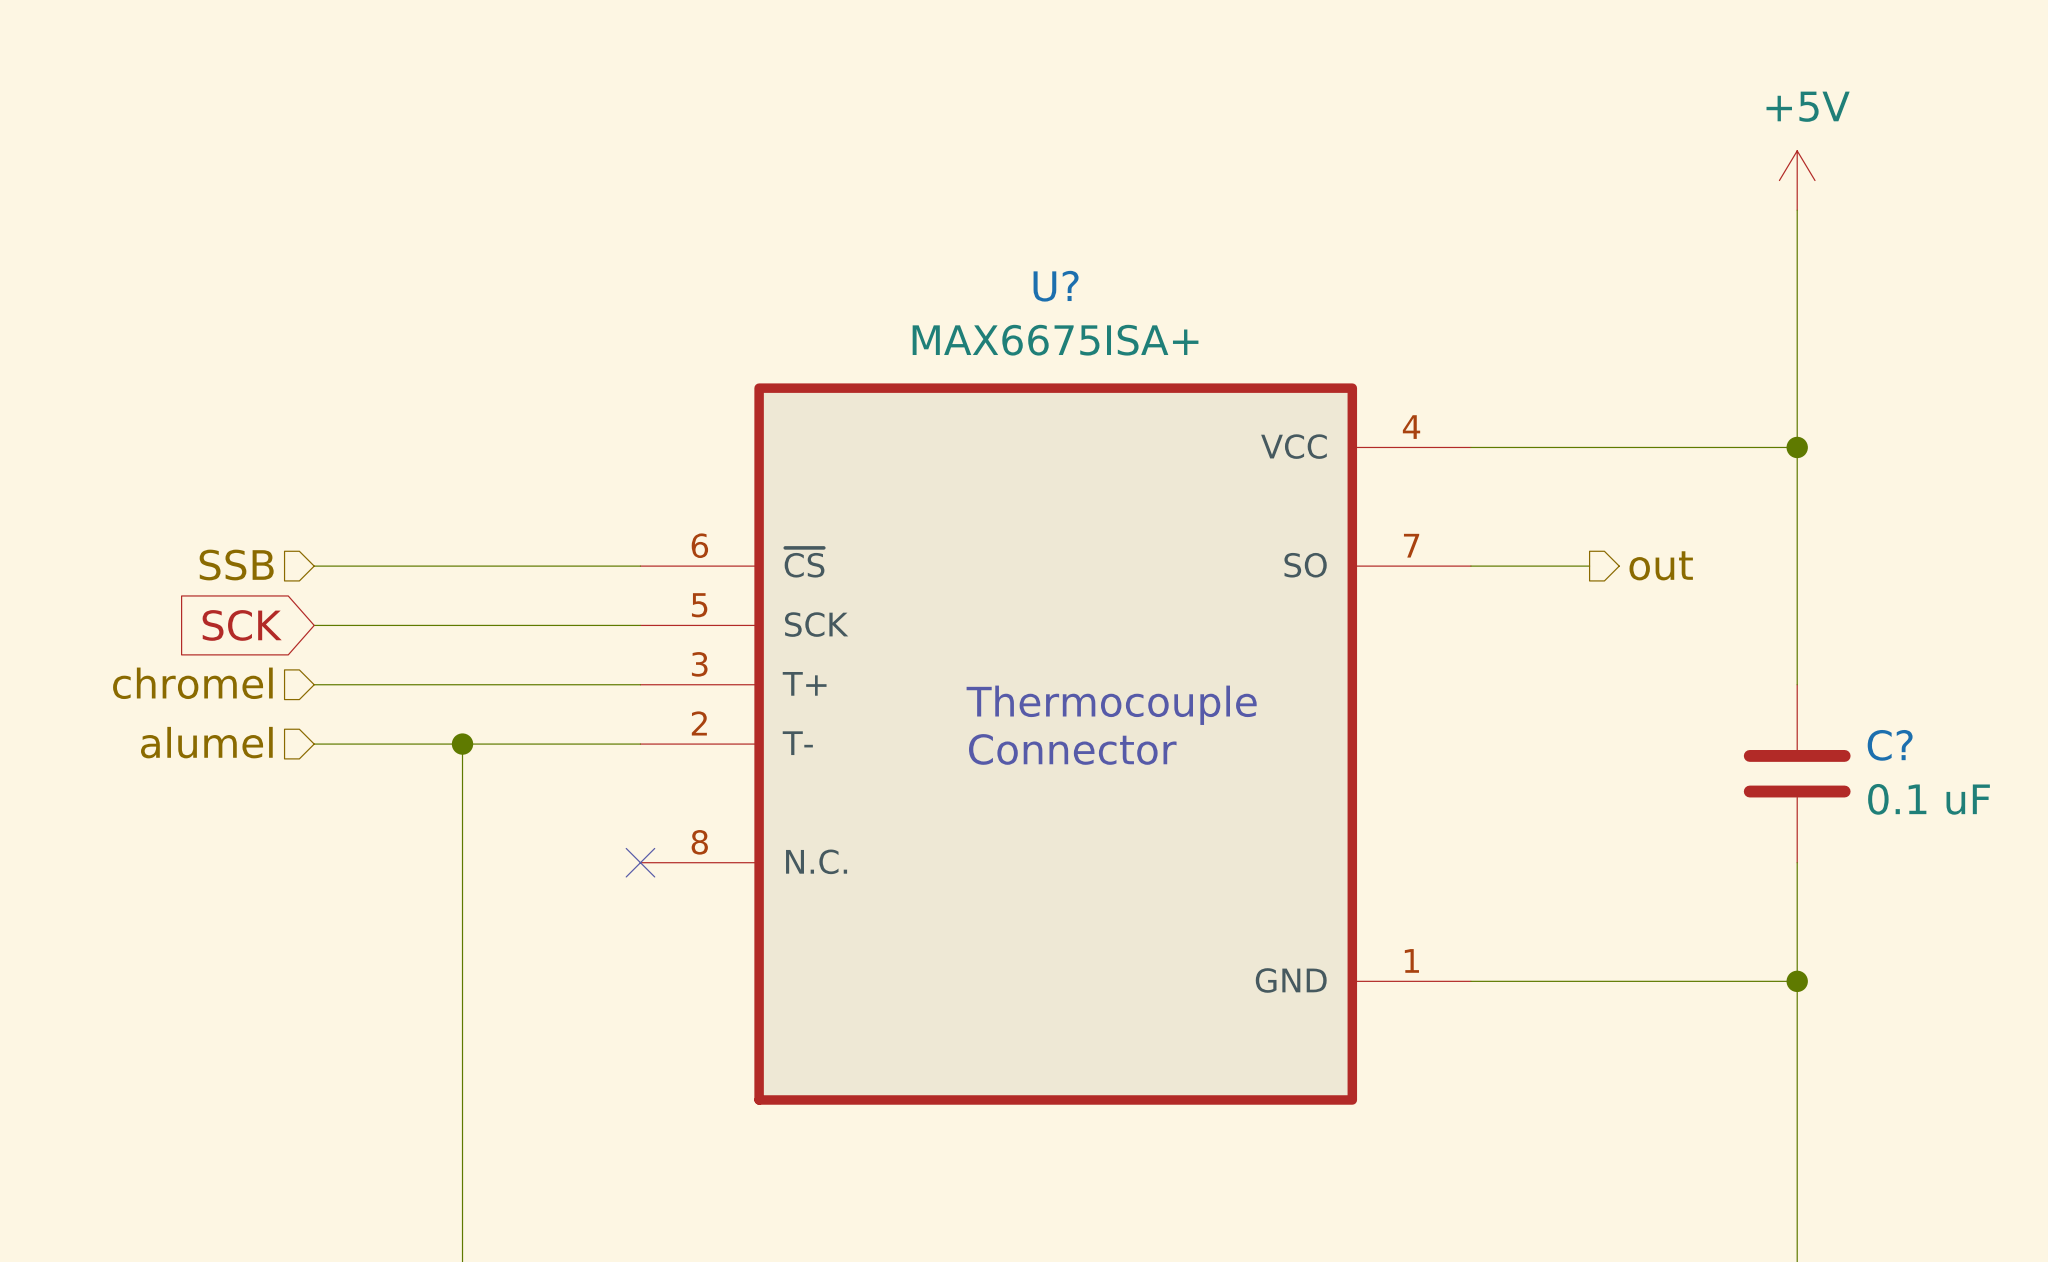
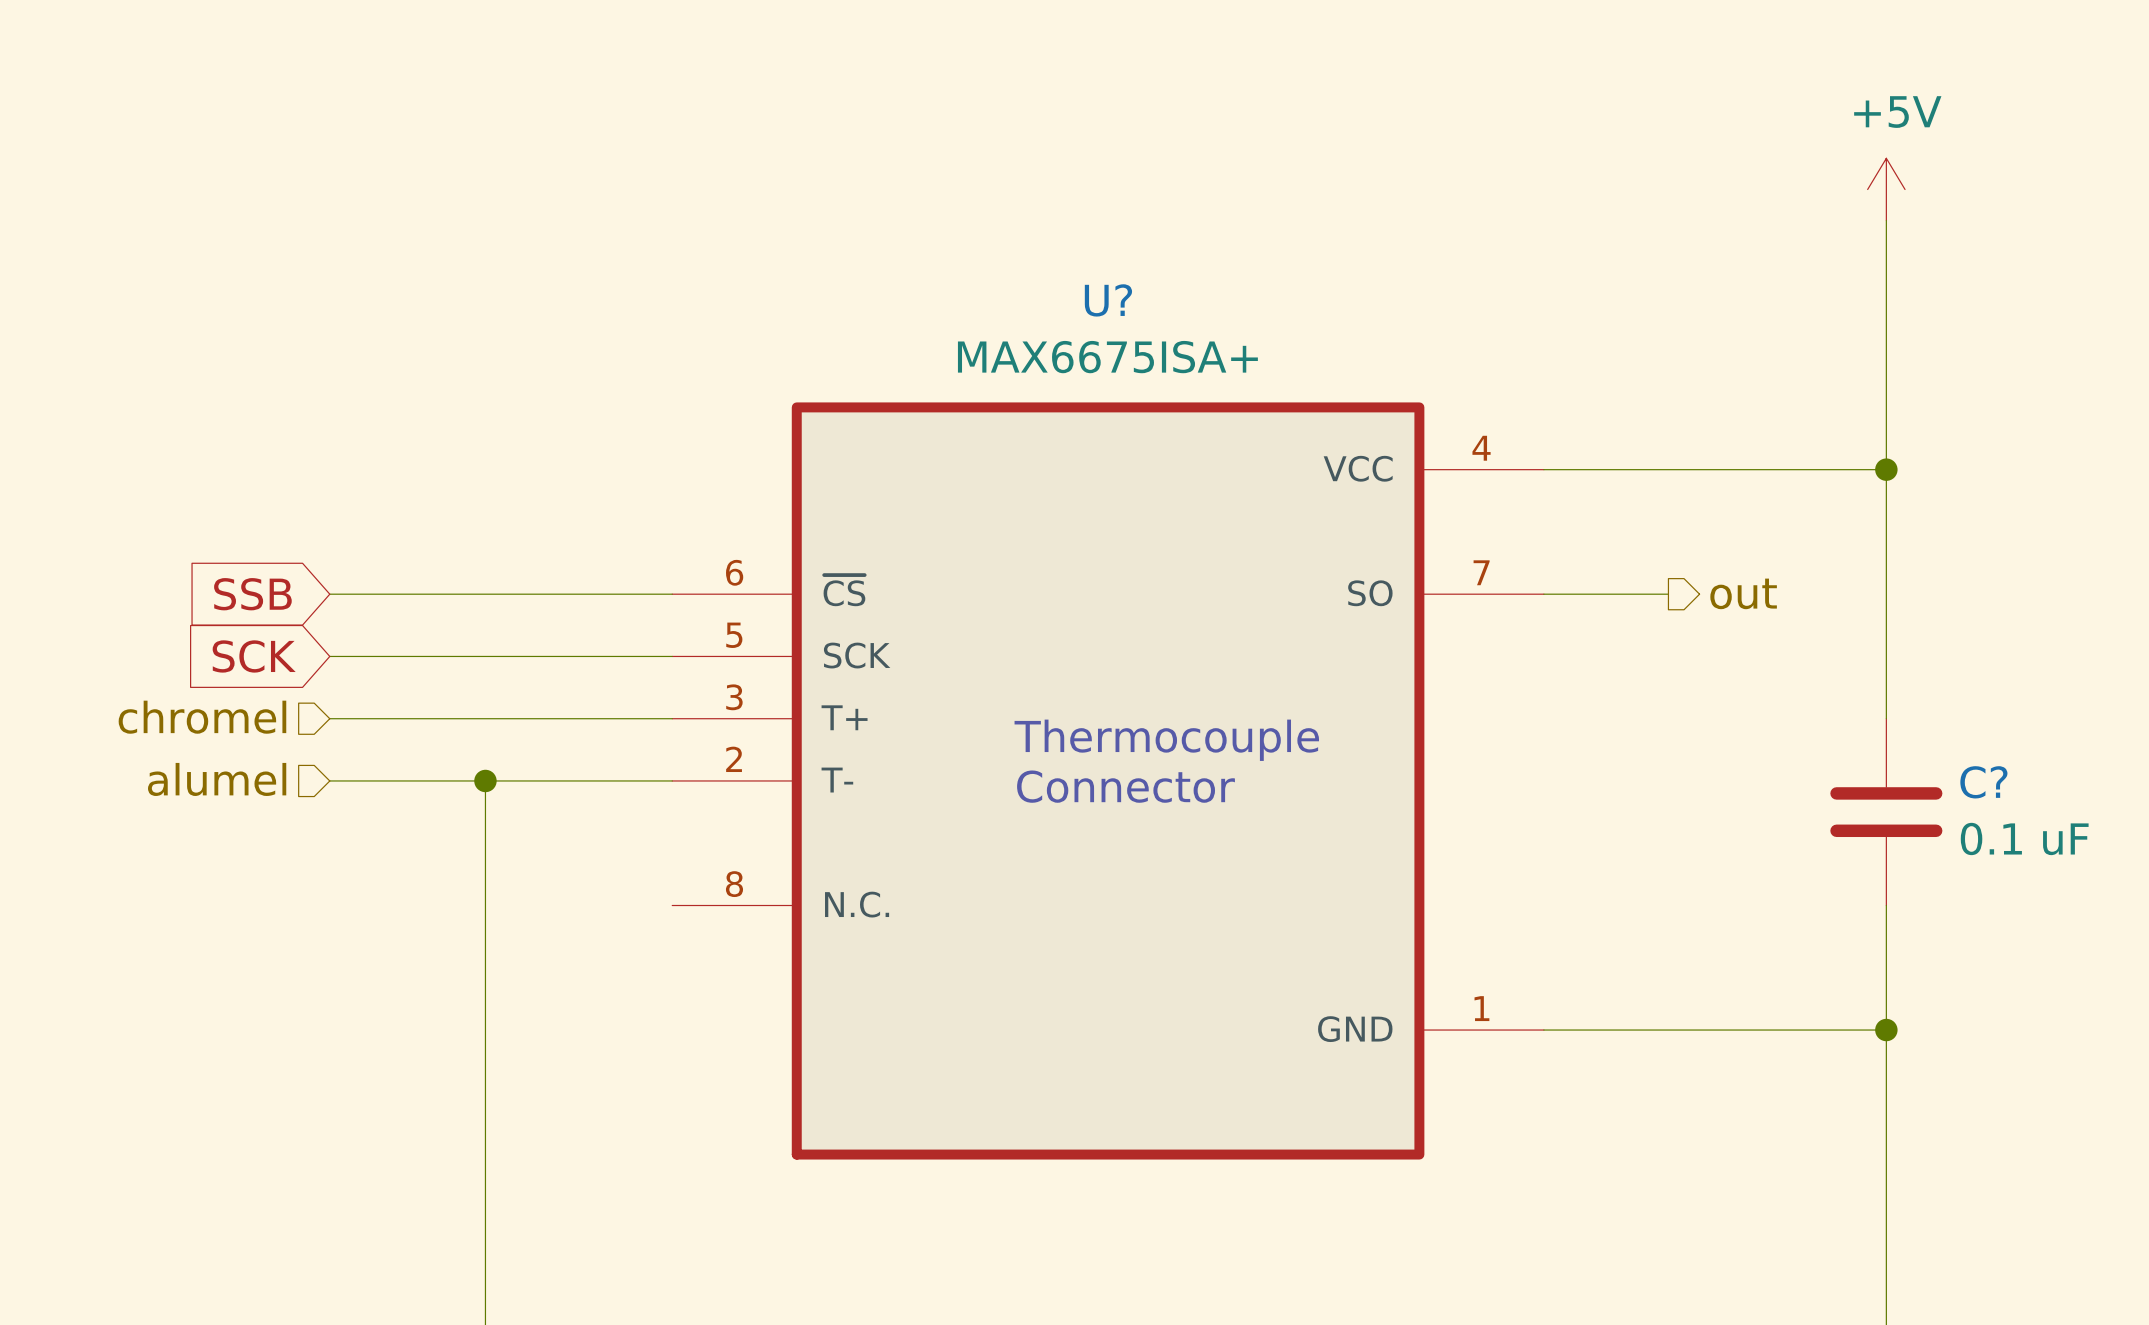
hierarchical label: SSB (236, 565) -> none
global label: none -> SSB (252, 594)
no-connect mark: (640, 862) -> none

